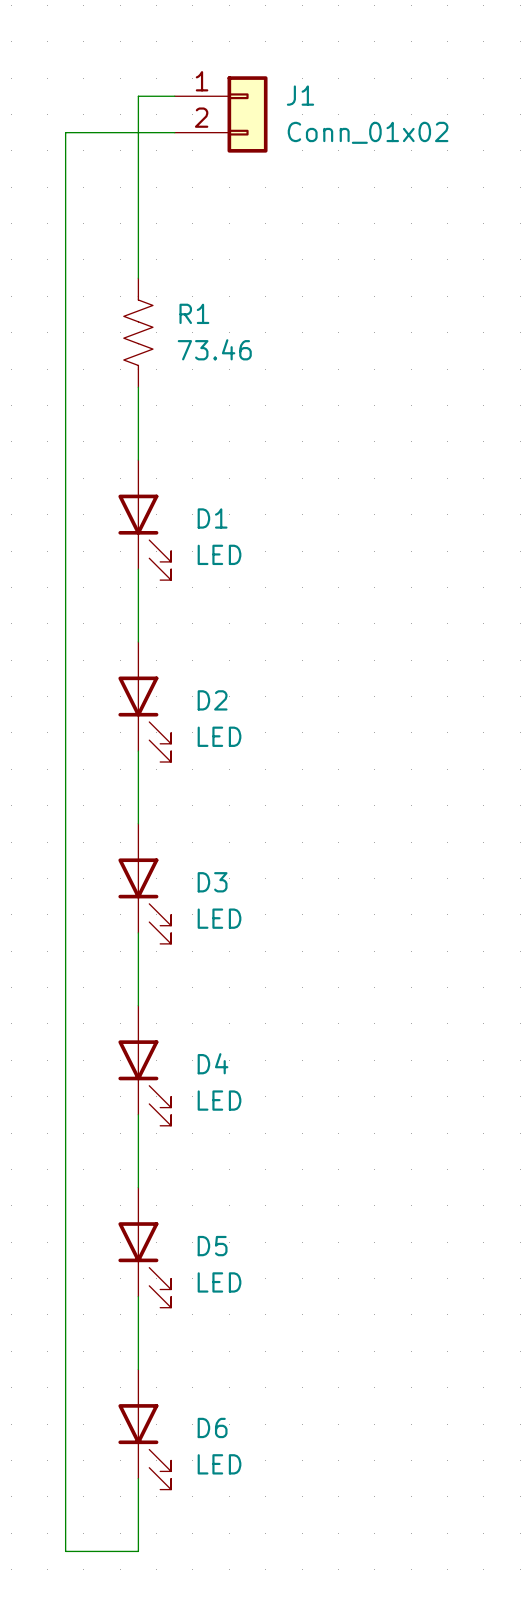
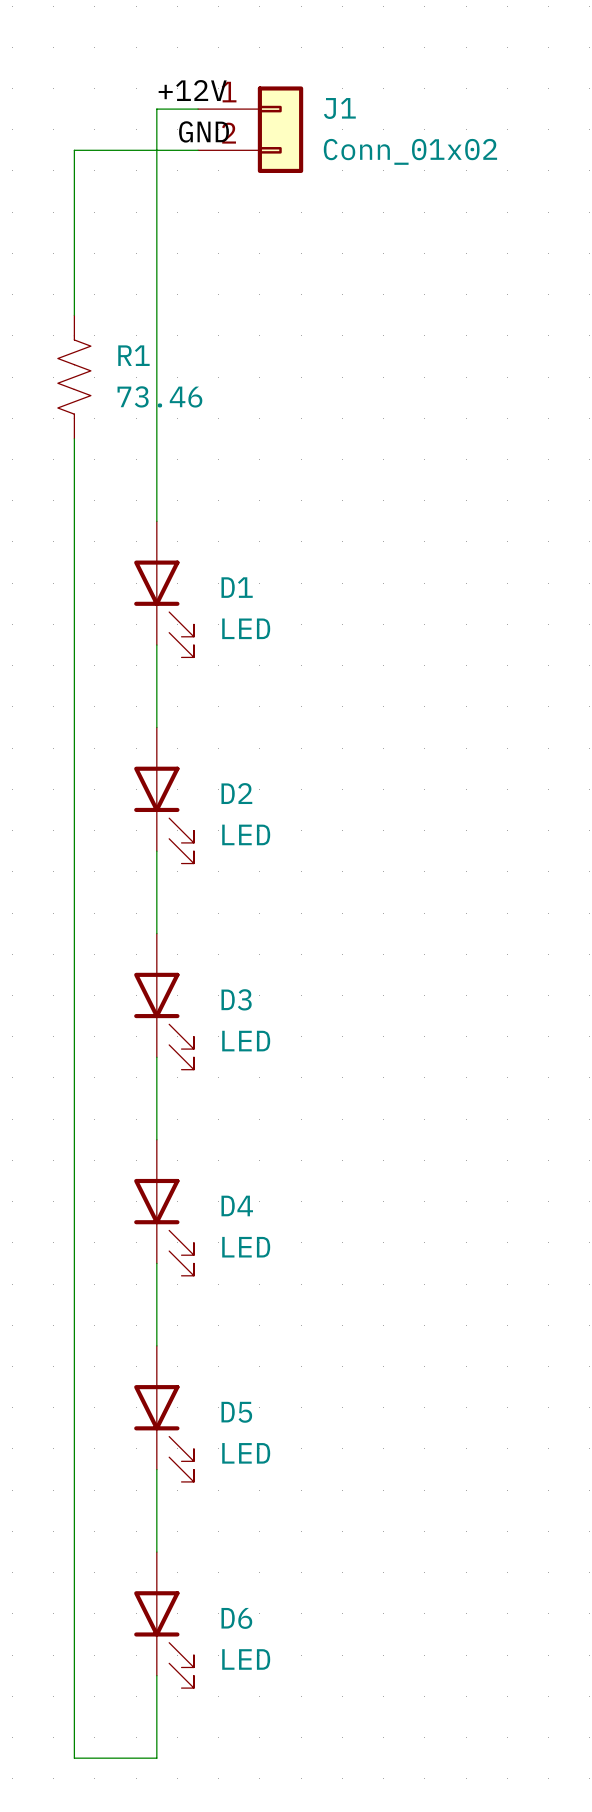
label: none -> +12V (192, 90)
label: none -> GND (204, 131)
wire: (65, 278) (65, 387) -> (156, 315) (156, 438)
R1 position: (138, 332) -> (74, 377)

